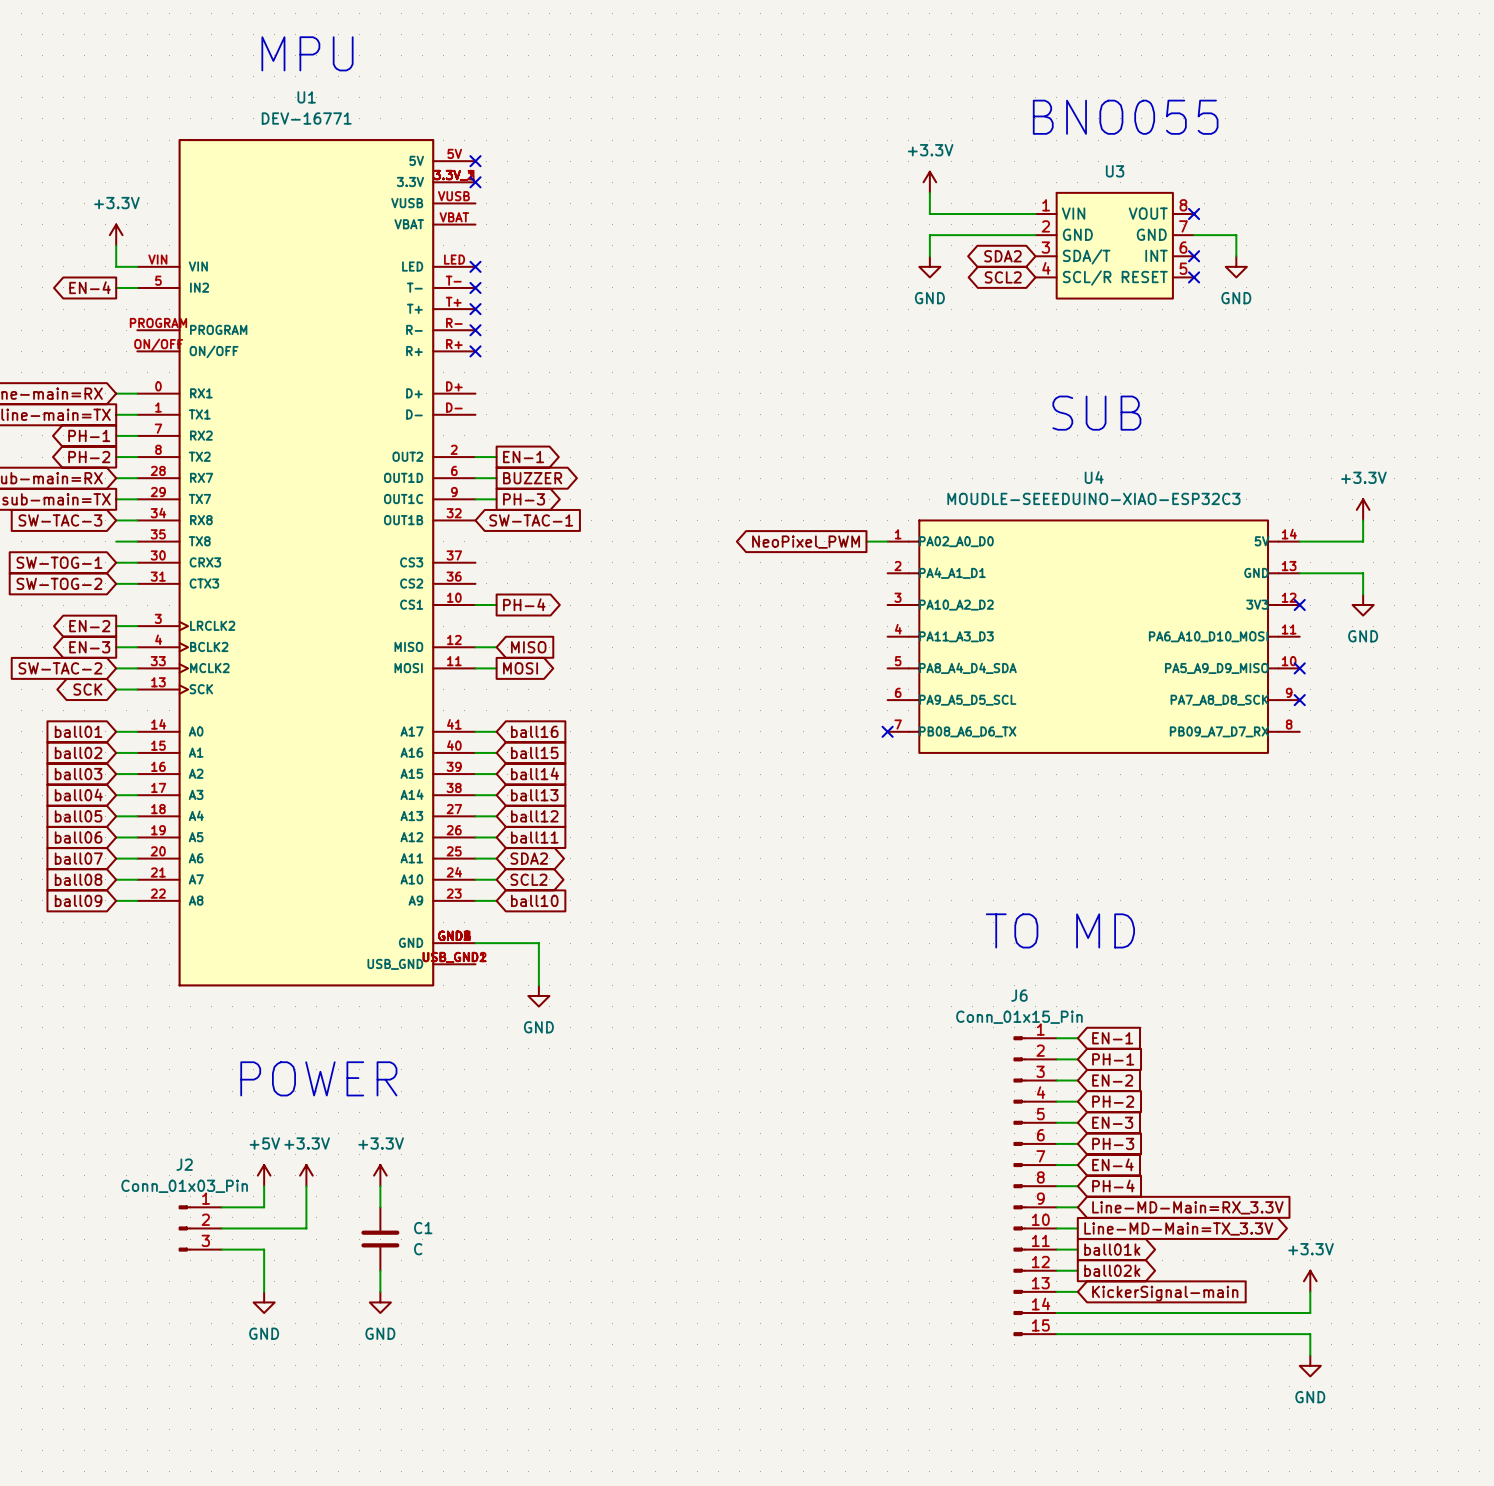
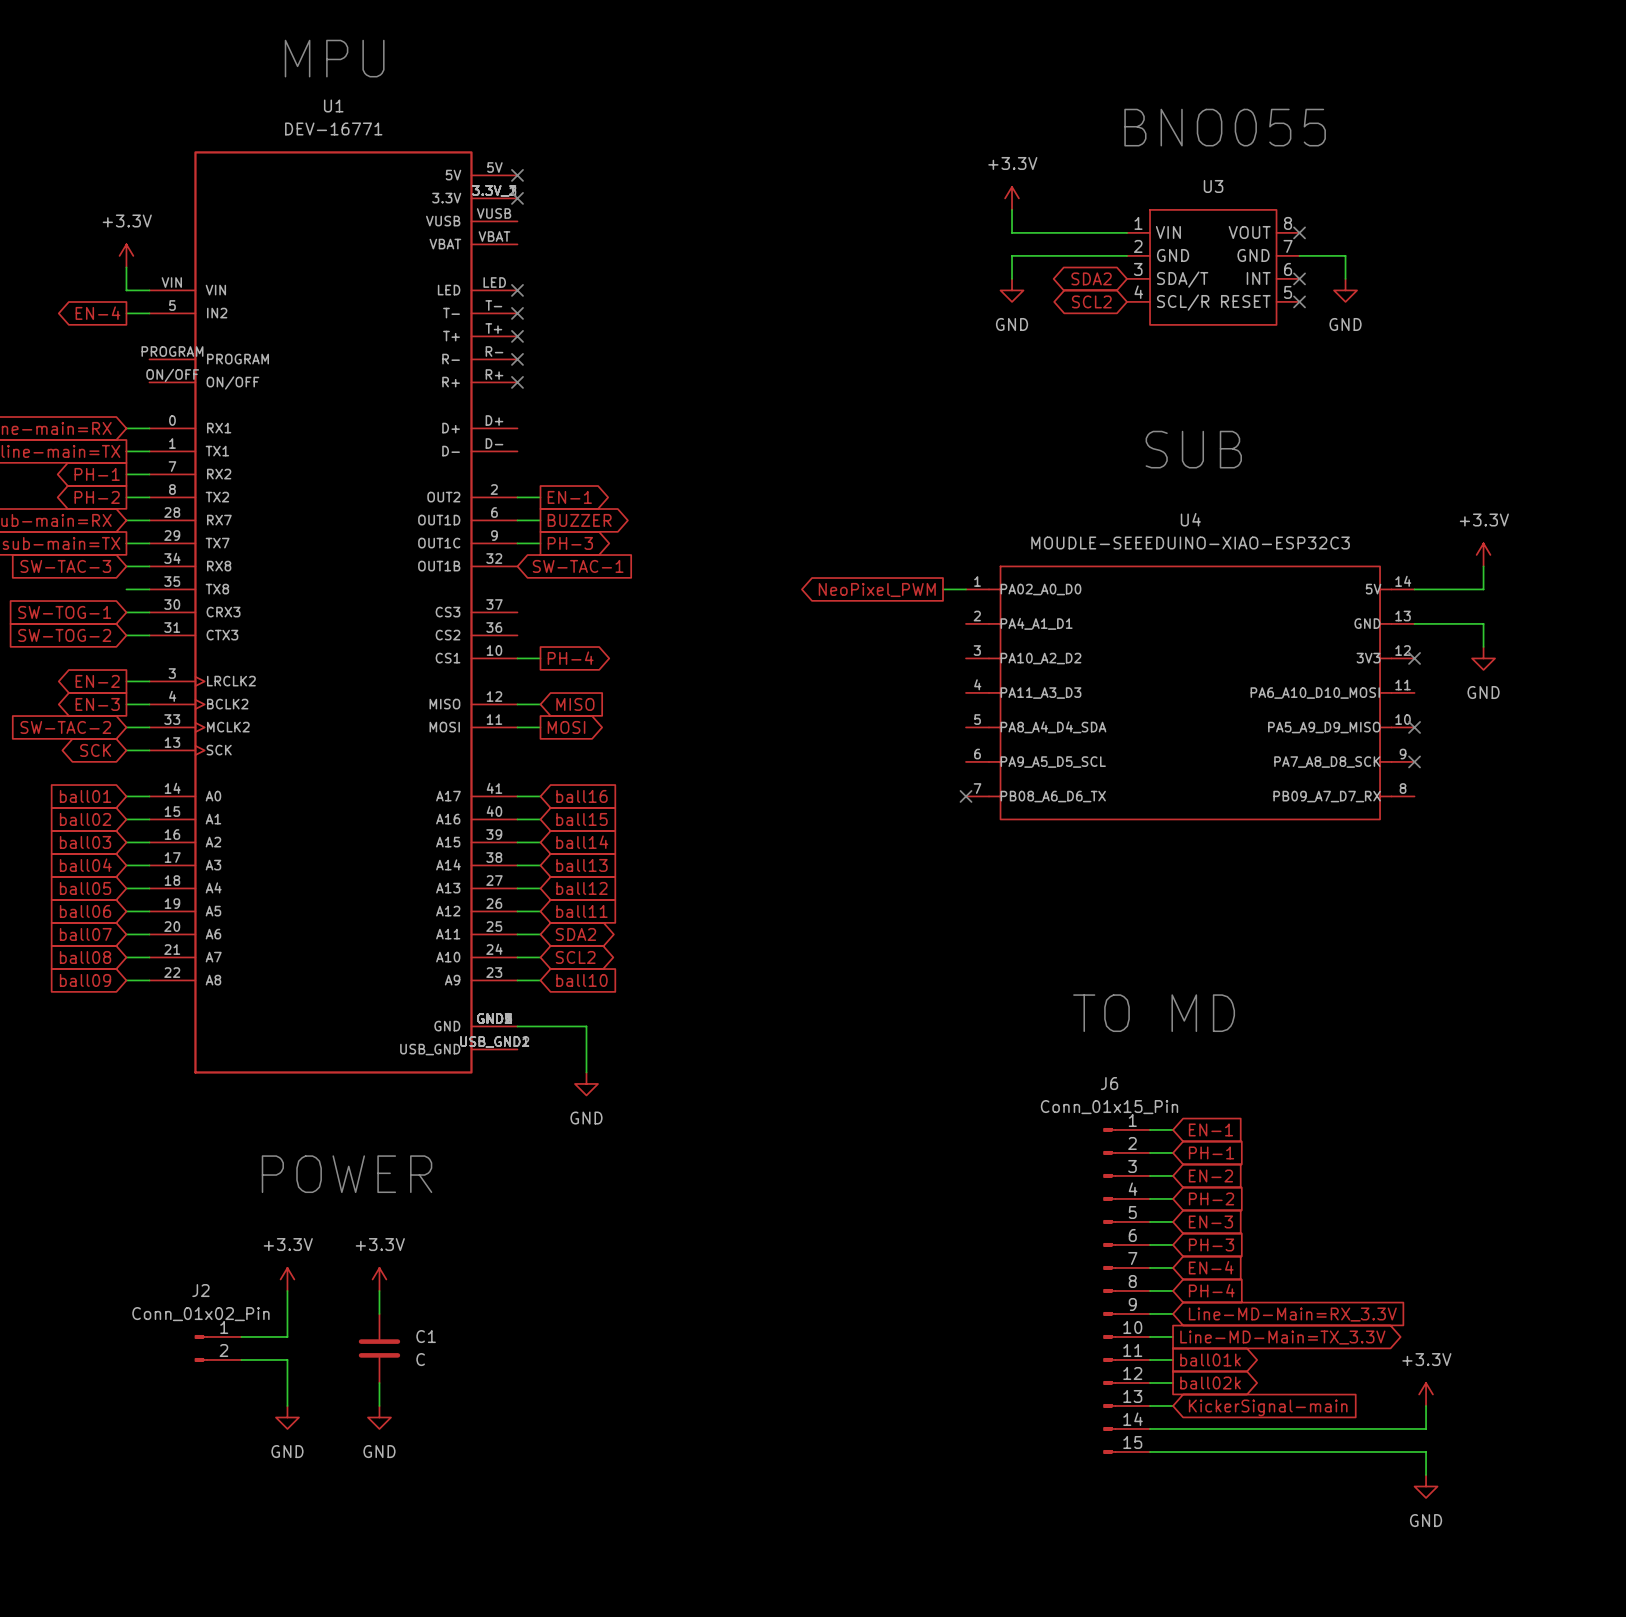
power symbol: +5V (264, 1175) -> +3.3V (287, 1279)
power symbol: +3.3V (306, 1175) -> none
power symbol: none -> +3.3V (379, 1279)
power symbol: +3.3V (380, 1175) -> none
J2 value: Conn_01x03_Pin (184, 1186) -> Conn_01x02_Pin (200, 1314)
wire: (306, 1186) (306, 1228) (264, 1228) -> (287, 1313) (287, 1336)
wire: (380, 1186) (380, 1207) -> (379, 1290) (379, 1313)
J2 symbol: [178, 1205, 222, 1252] -> [194, 1335, 242, 1362]
wire: (221, 1207) (264, 1207) -> none
C1 position: (380, 1239) -> (379, 1348)
wire: (380, 1270) (380, 1291) -> (379, 1382) (379, 1405)
power symbol position: GND (380, 1302) -> GND (379, 1417)

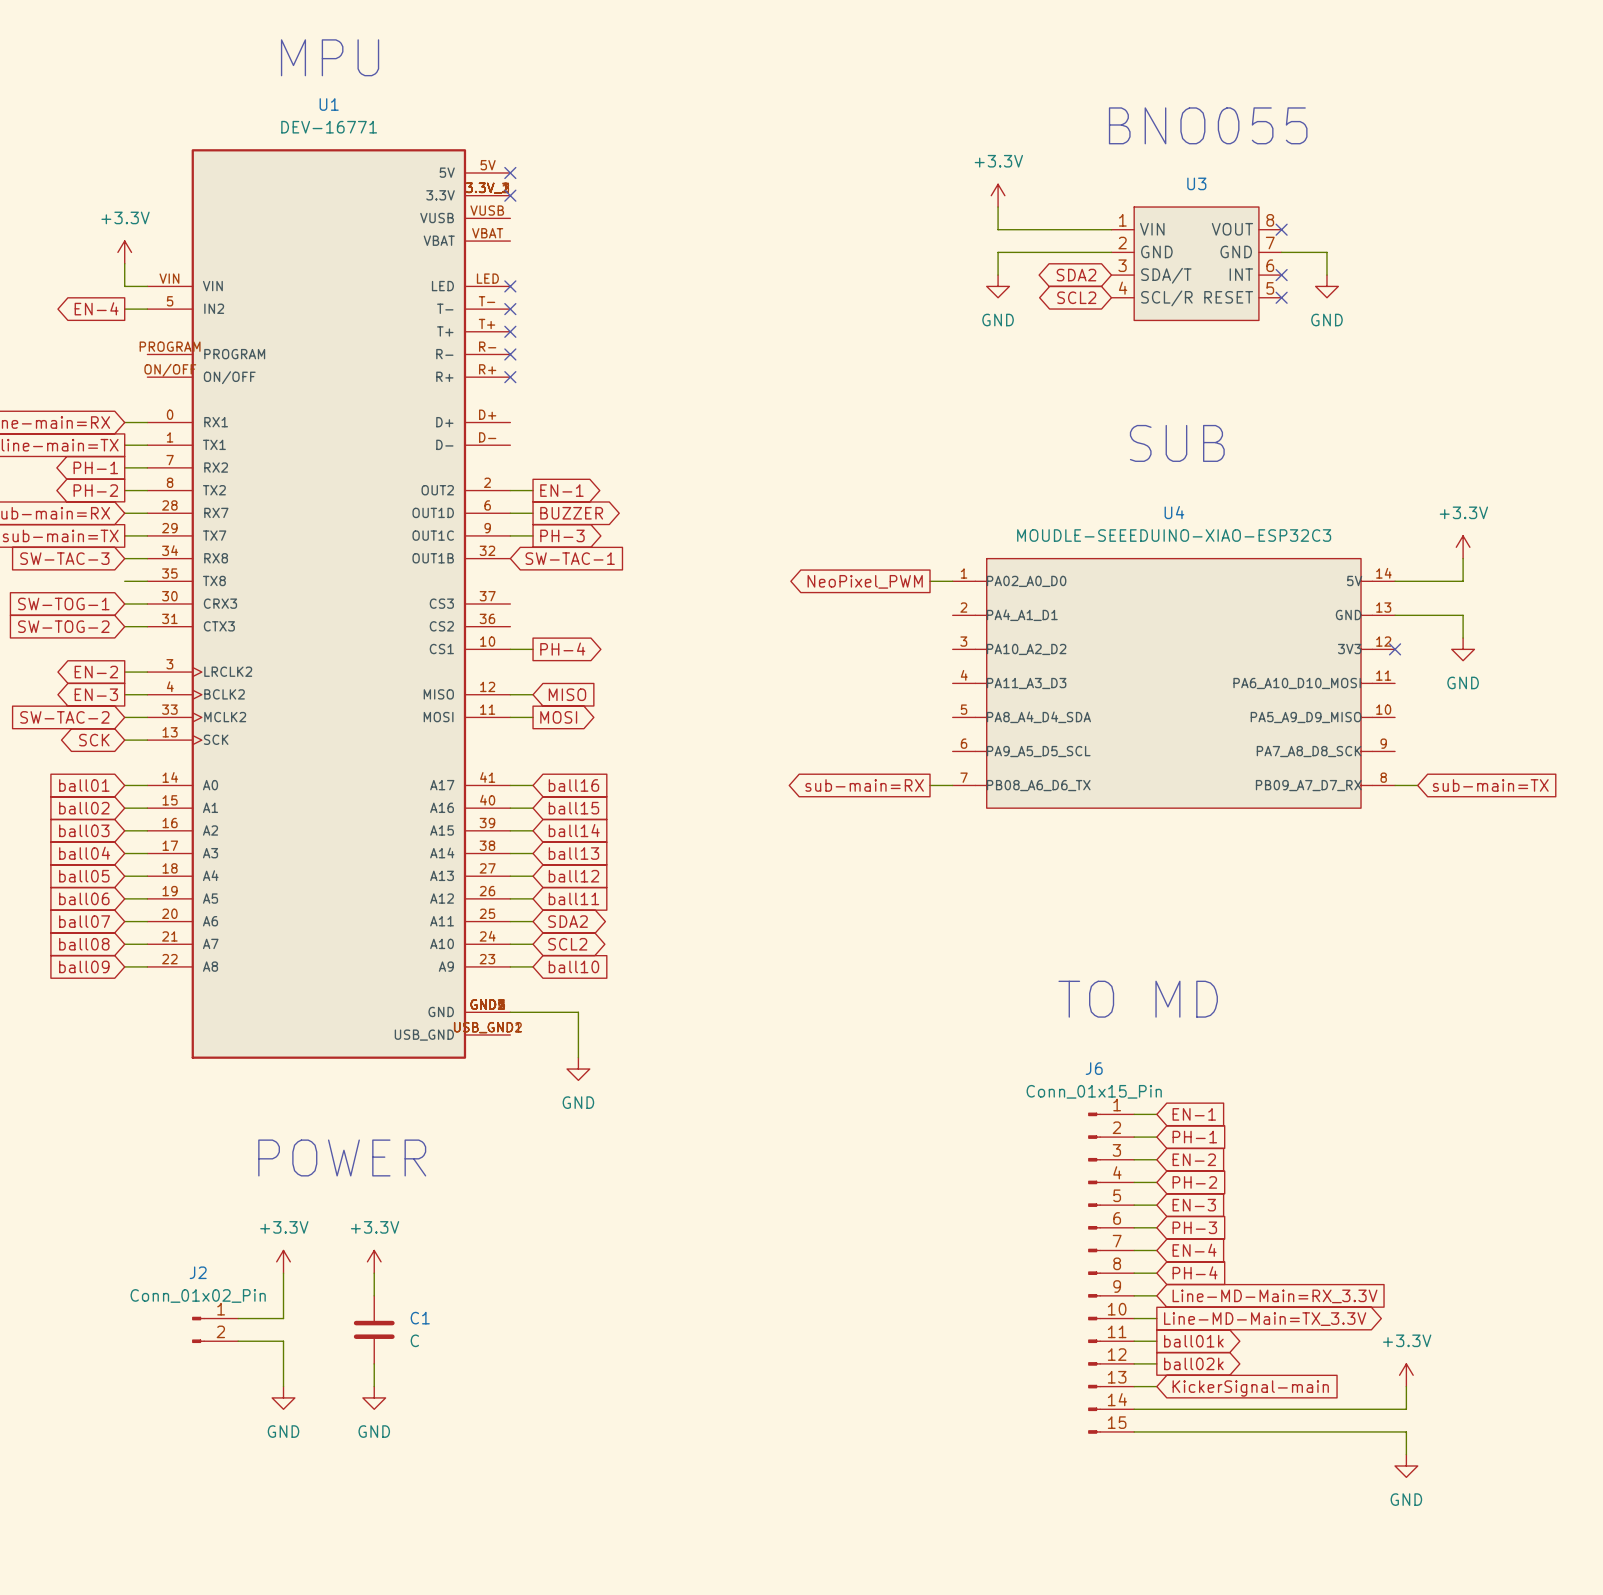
no-connect mark: (1414, 727) -> none
no-connect mark: (1414, 761) -> none
global label: none -> sub-main=RX (864, 785)
wire: none -> (930, 785) (952, 785)
no-connect mark: (966, 796) -> none
wire: none -> (1395, 785) (1417, 785)
global label: none -> sub-main=TX (1490, 785)

